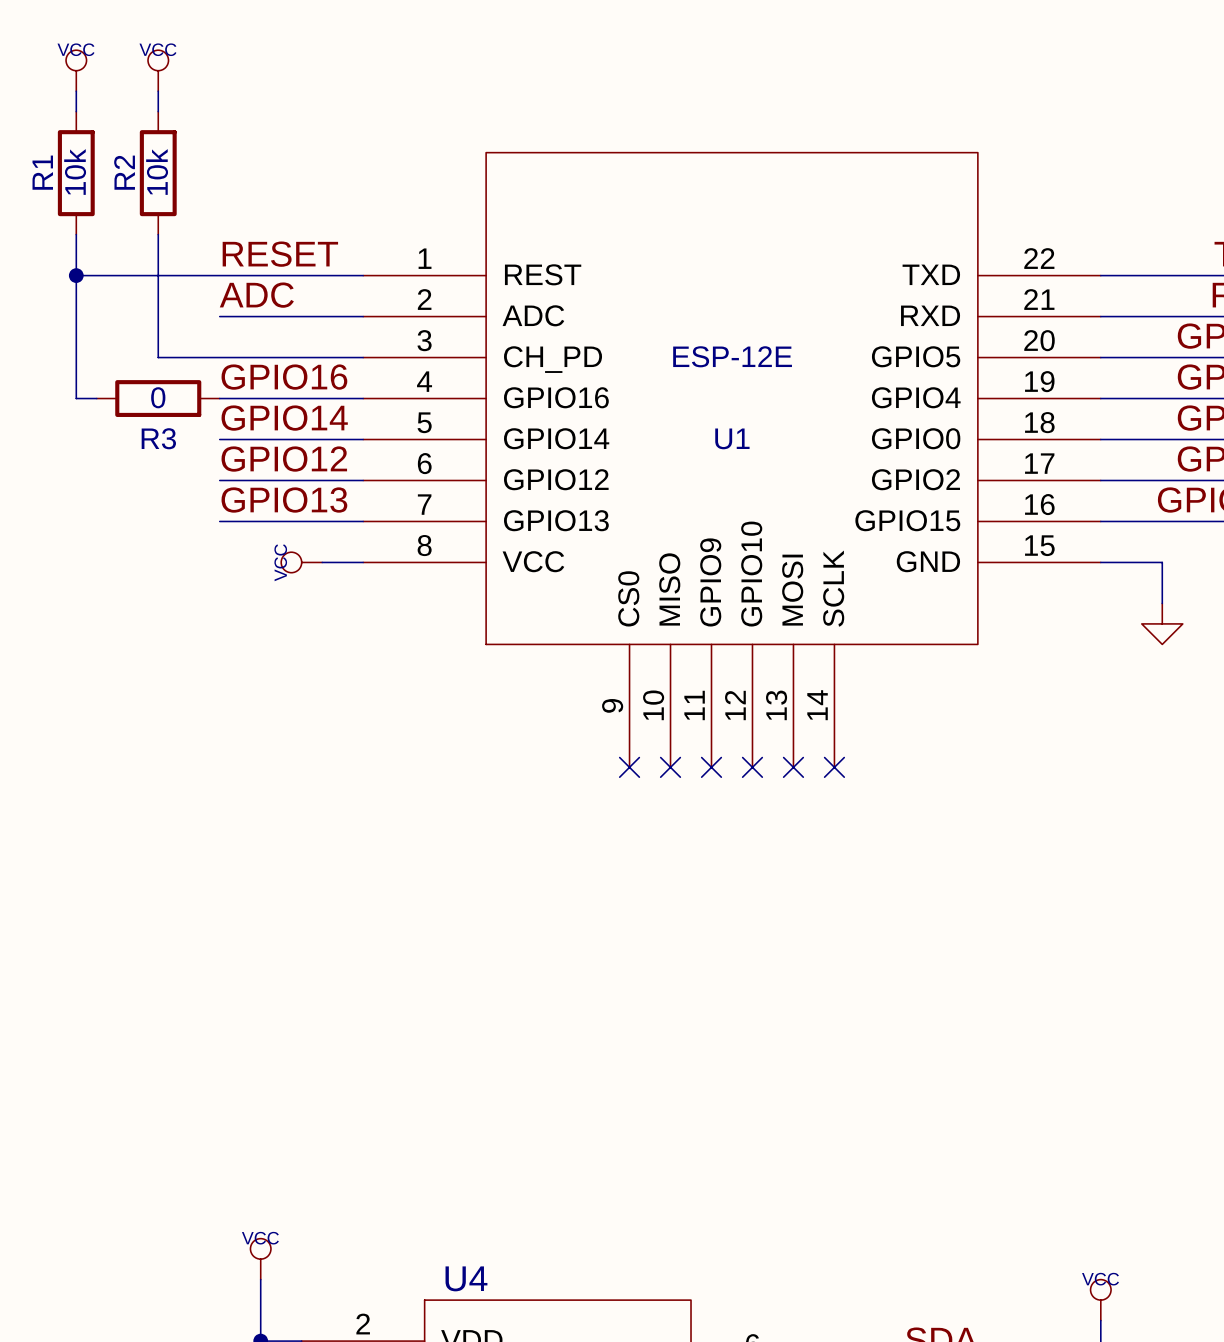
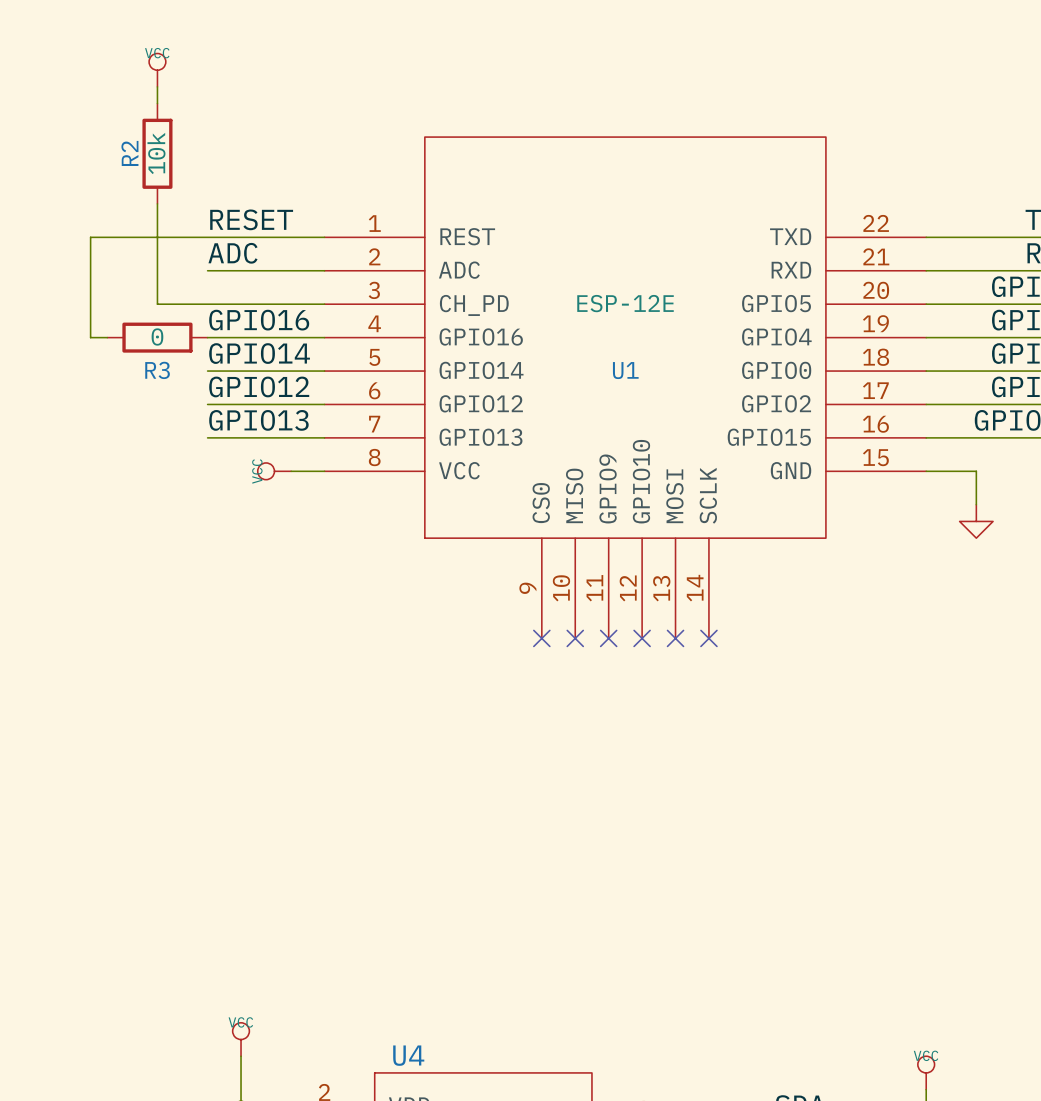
power symbol: VCC (76, 70) -> none
wire: (76, 91) (76, 111) -> none
R1: 10k (76, 173) -> none
wire: (76, 234) (76, 275) -> none
junction: (76, 275) -> none

